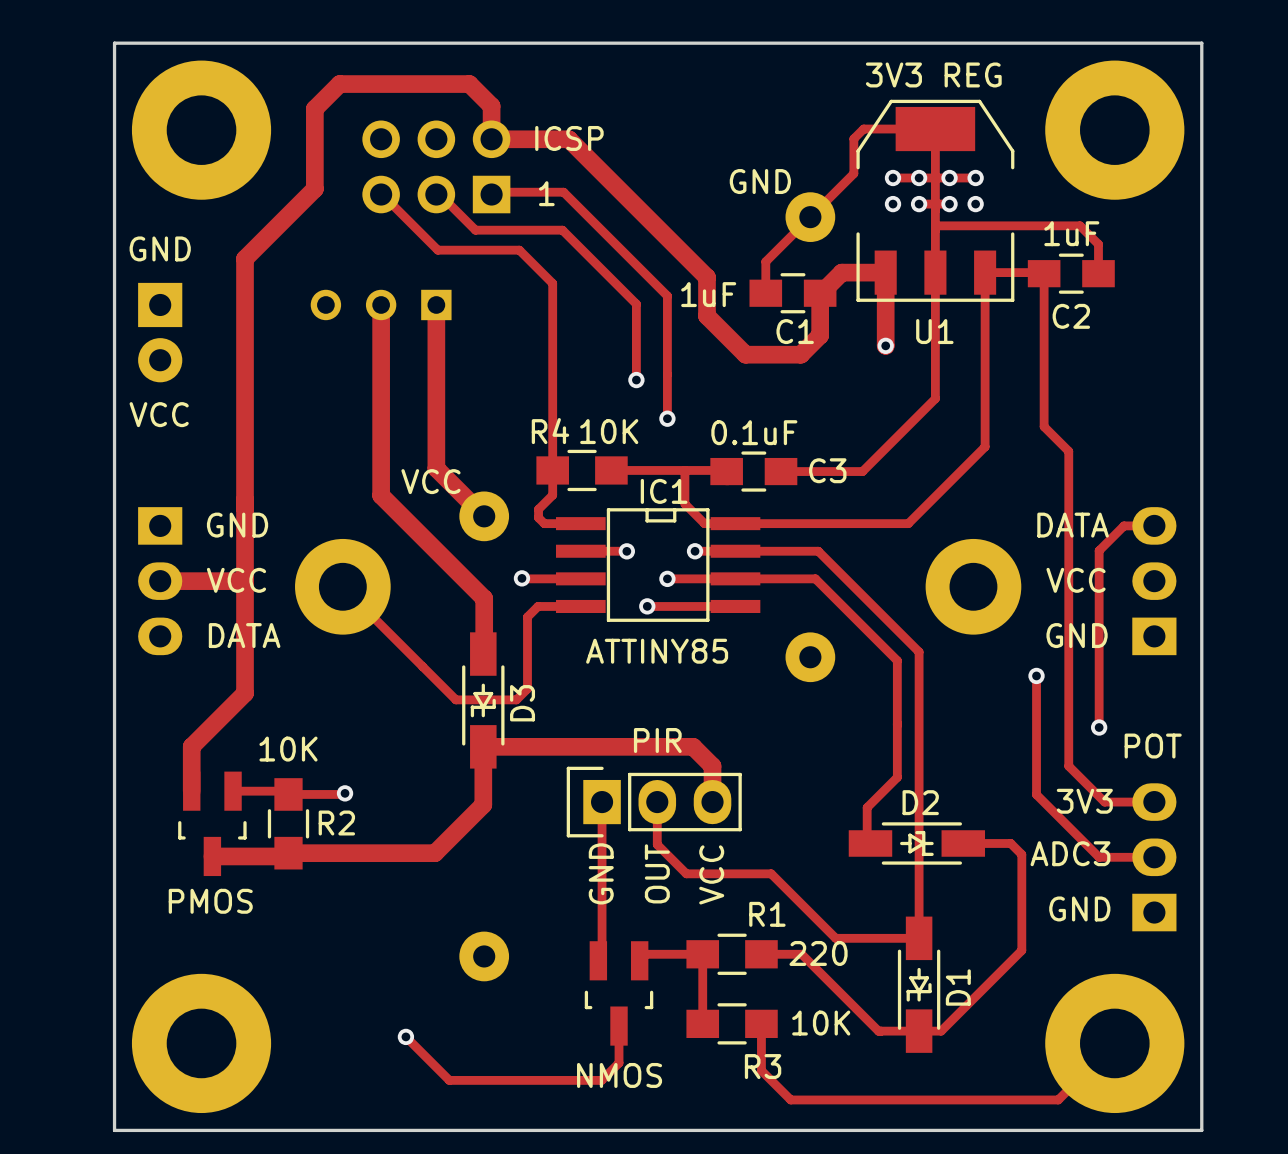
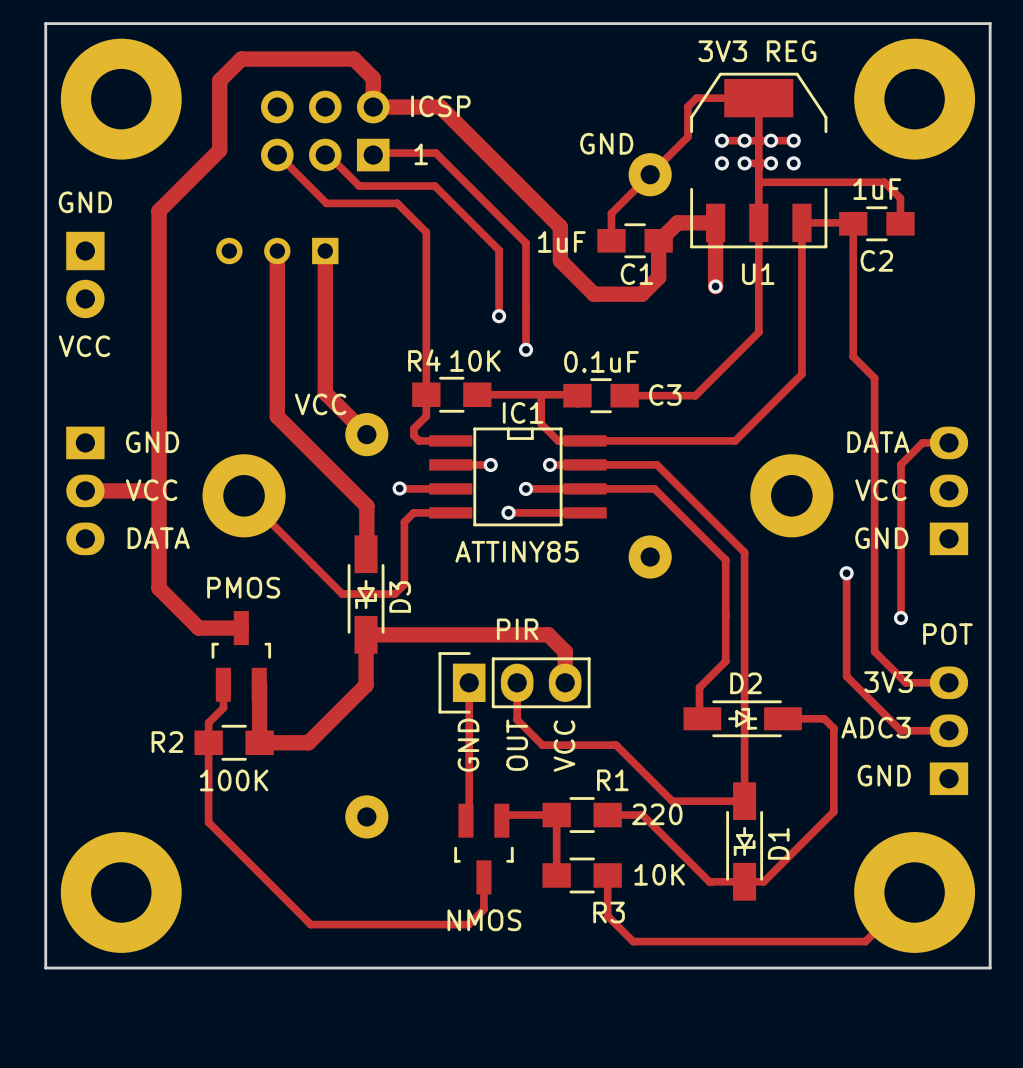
track: (245, 693) (191, 746) (191, 791) -> (159, 588) (198, 628) (241, 628)
R2 value: 10K (288, 749) -> 100K (234, 780)
track: (233, 791) (285, 791) (288, 794) (345, 793) -> none
via: (345, 793) -> none
part rotation: 0° (212, 823) -> 180° (241, 656)
part position: (212, 823) -> (241, 656)
R2 rotation: 0° (288, 823) -> 90° clockwise (234, 742)
R2 position: (288, 823) -> (234, 742)
R2 name position: R2 (336, 823) -> R2 (167, 742)
track: (434, 853) (288, 853) (285, 856) (212, 856) -> (324, 727) (308, 742) (259, 742) (259, 684)
track: (405, 1036) (449, 1080) -> (223, 684) (223, 707) (208, 722) (208, 822) (310, 924) (336, 924)
via: (405, 1036) -> none

